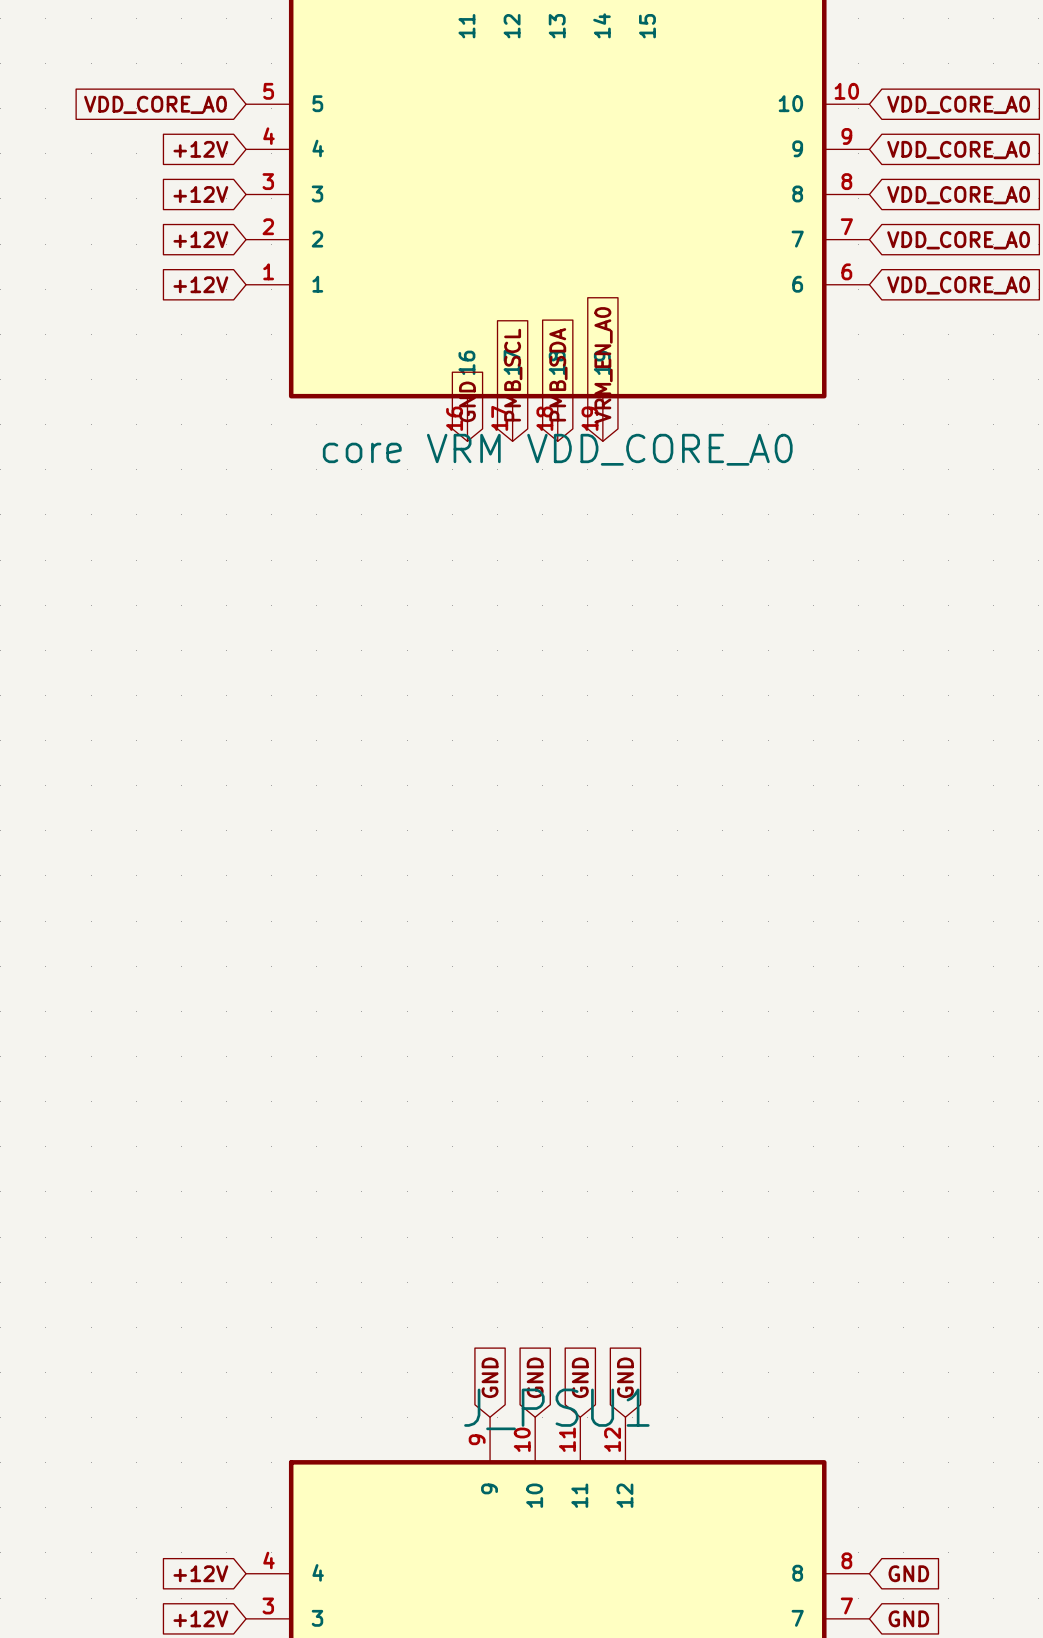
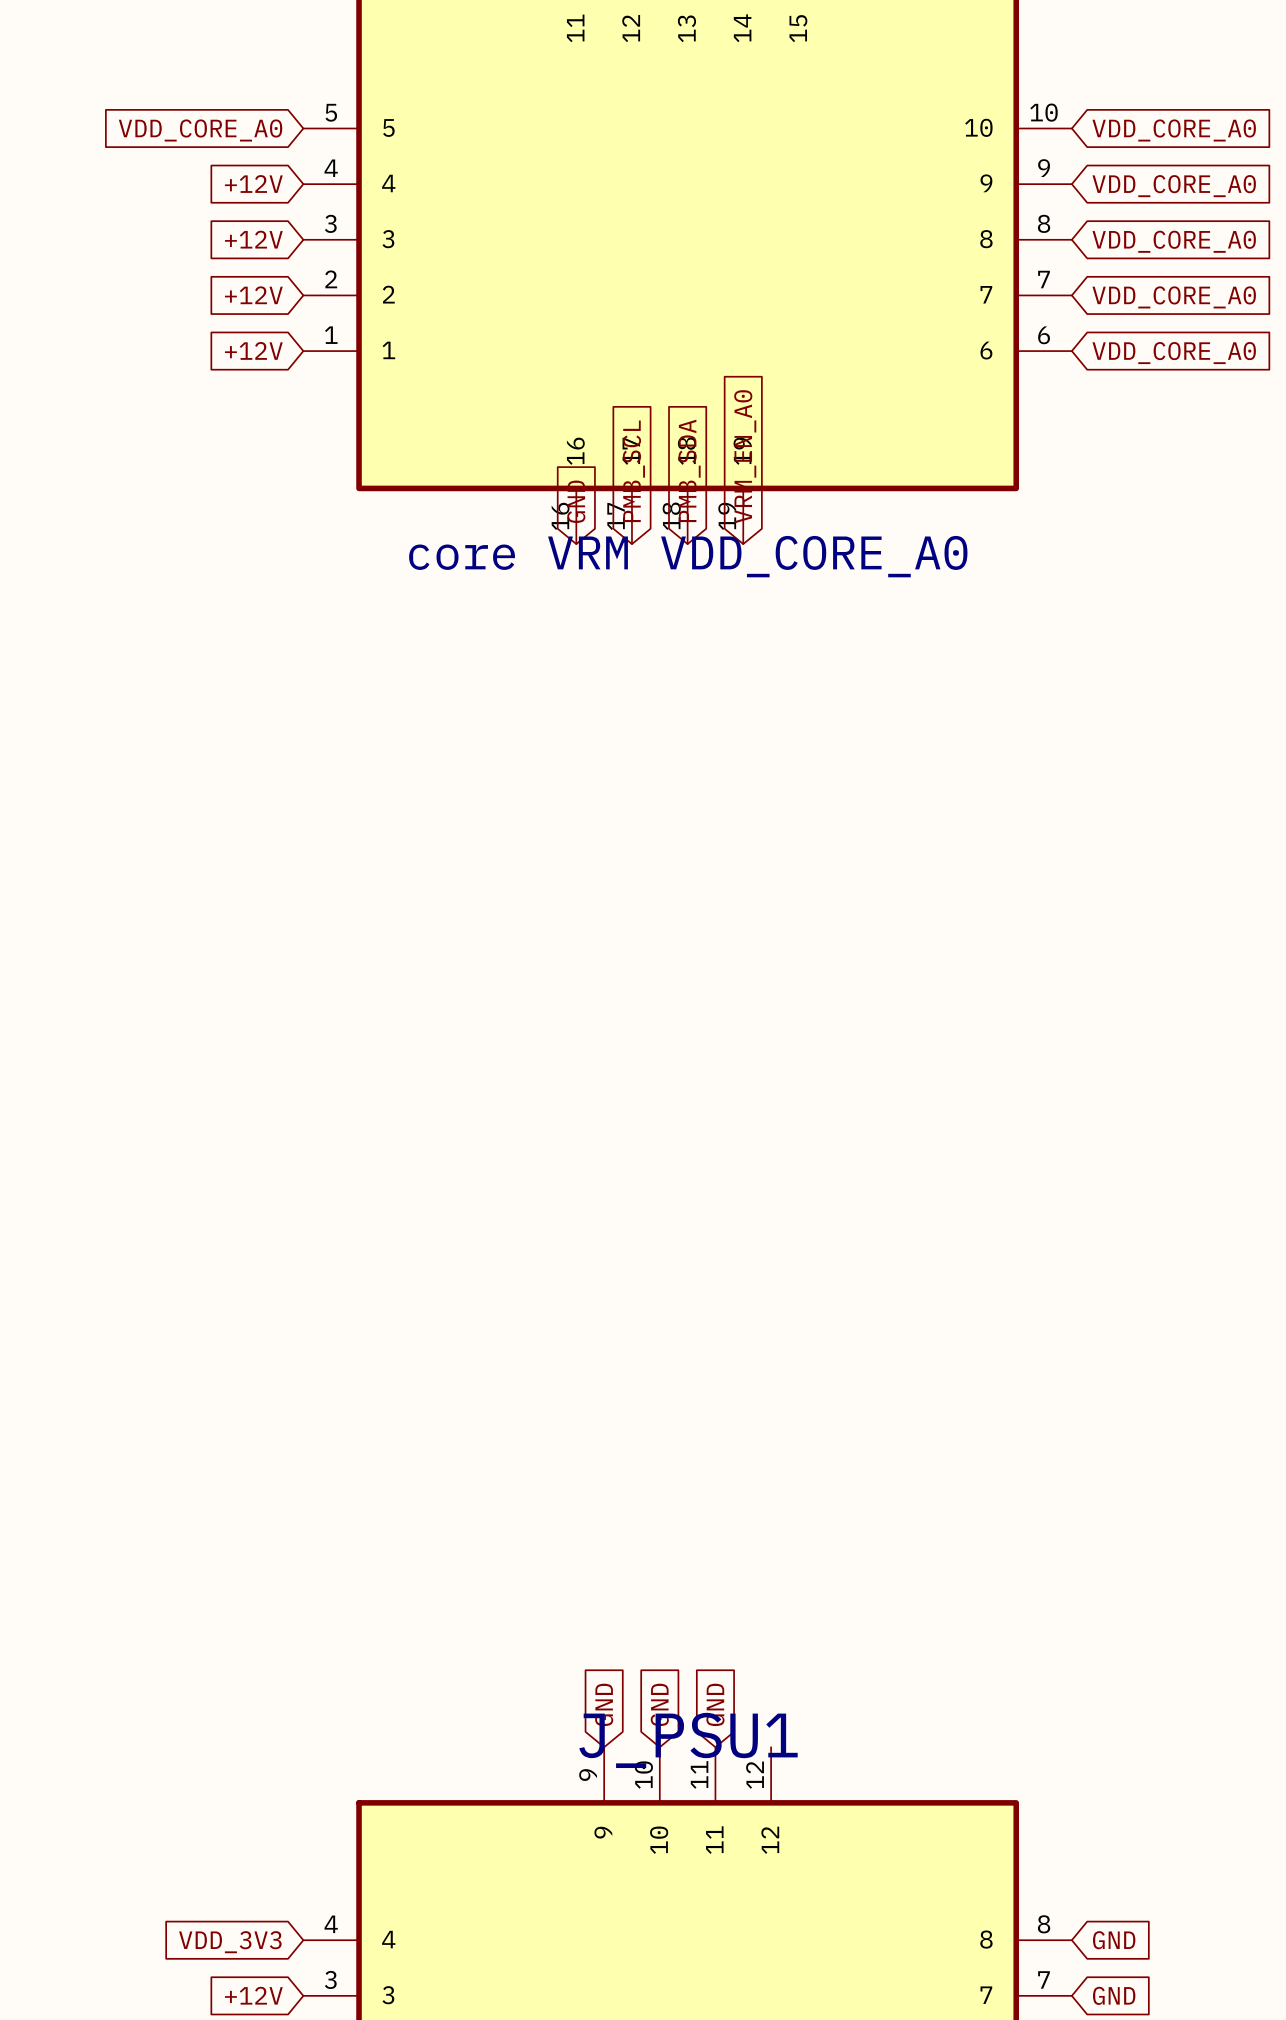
global label: GND (625, 1377) -> none
global label: +12V (200, 1573) -> VDD_3V3 (230, 1942)

